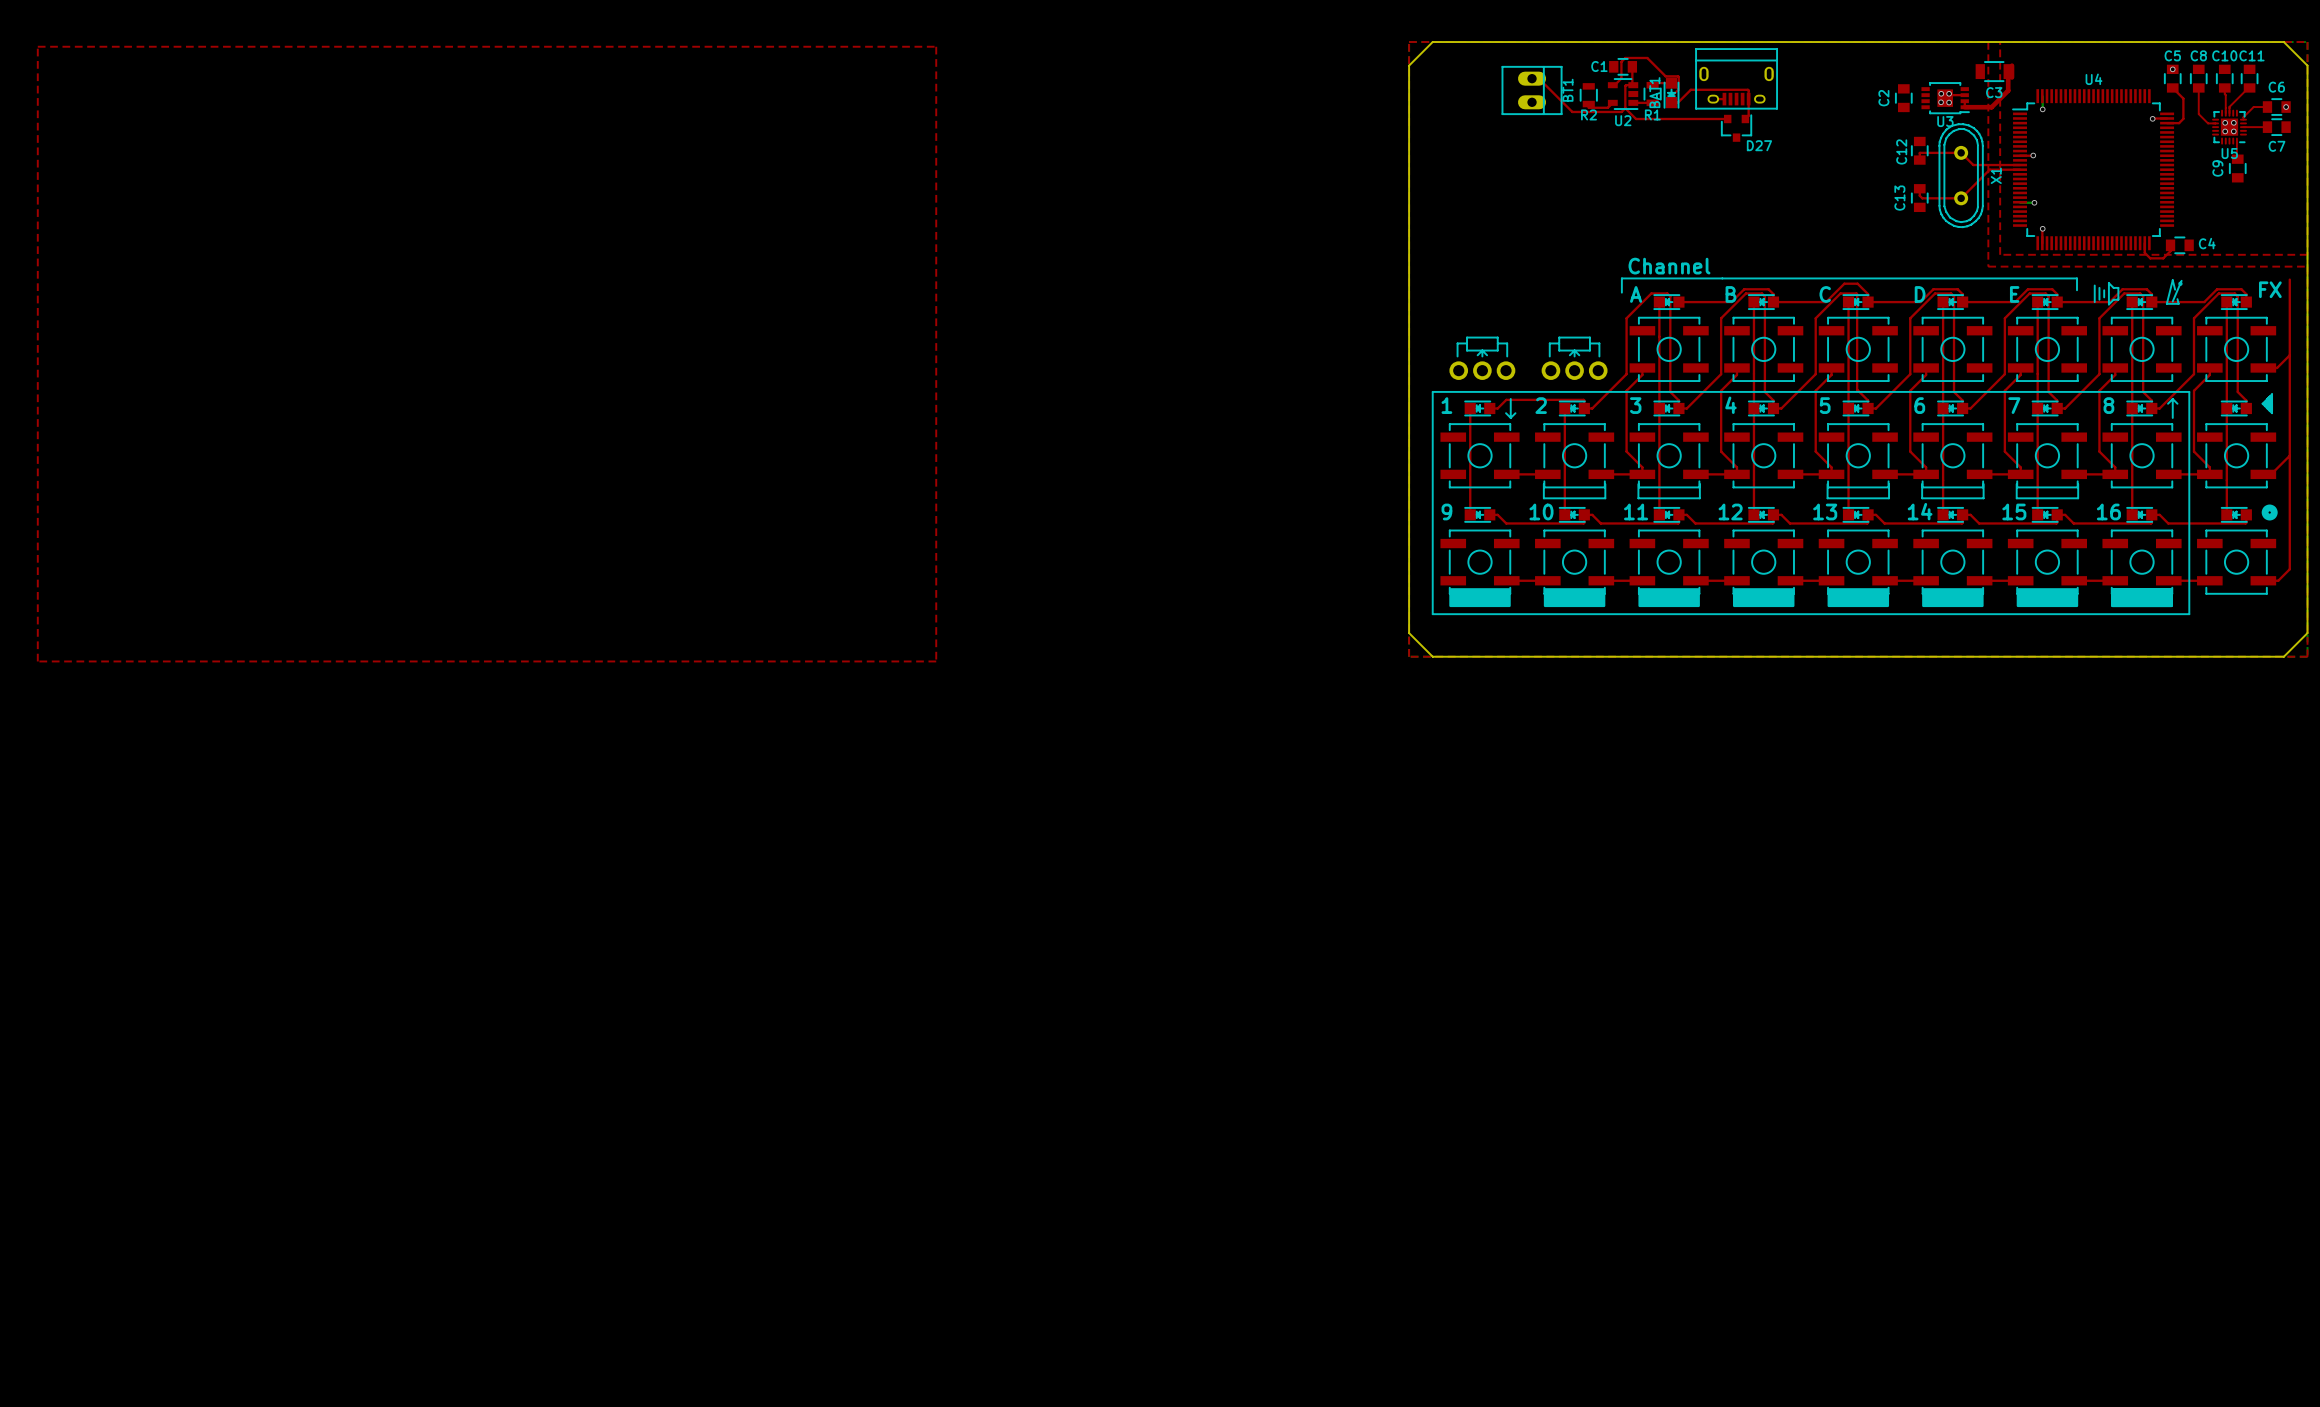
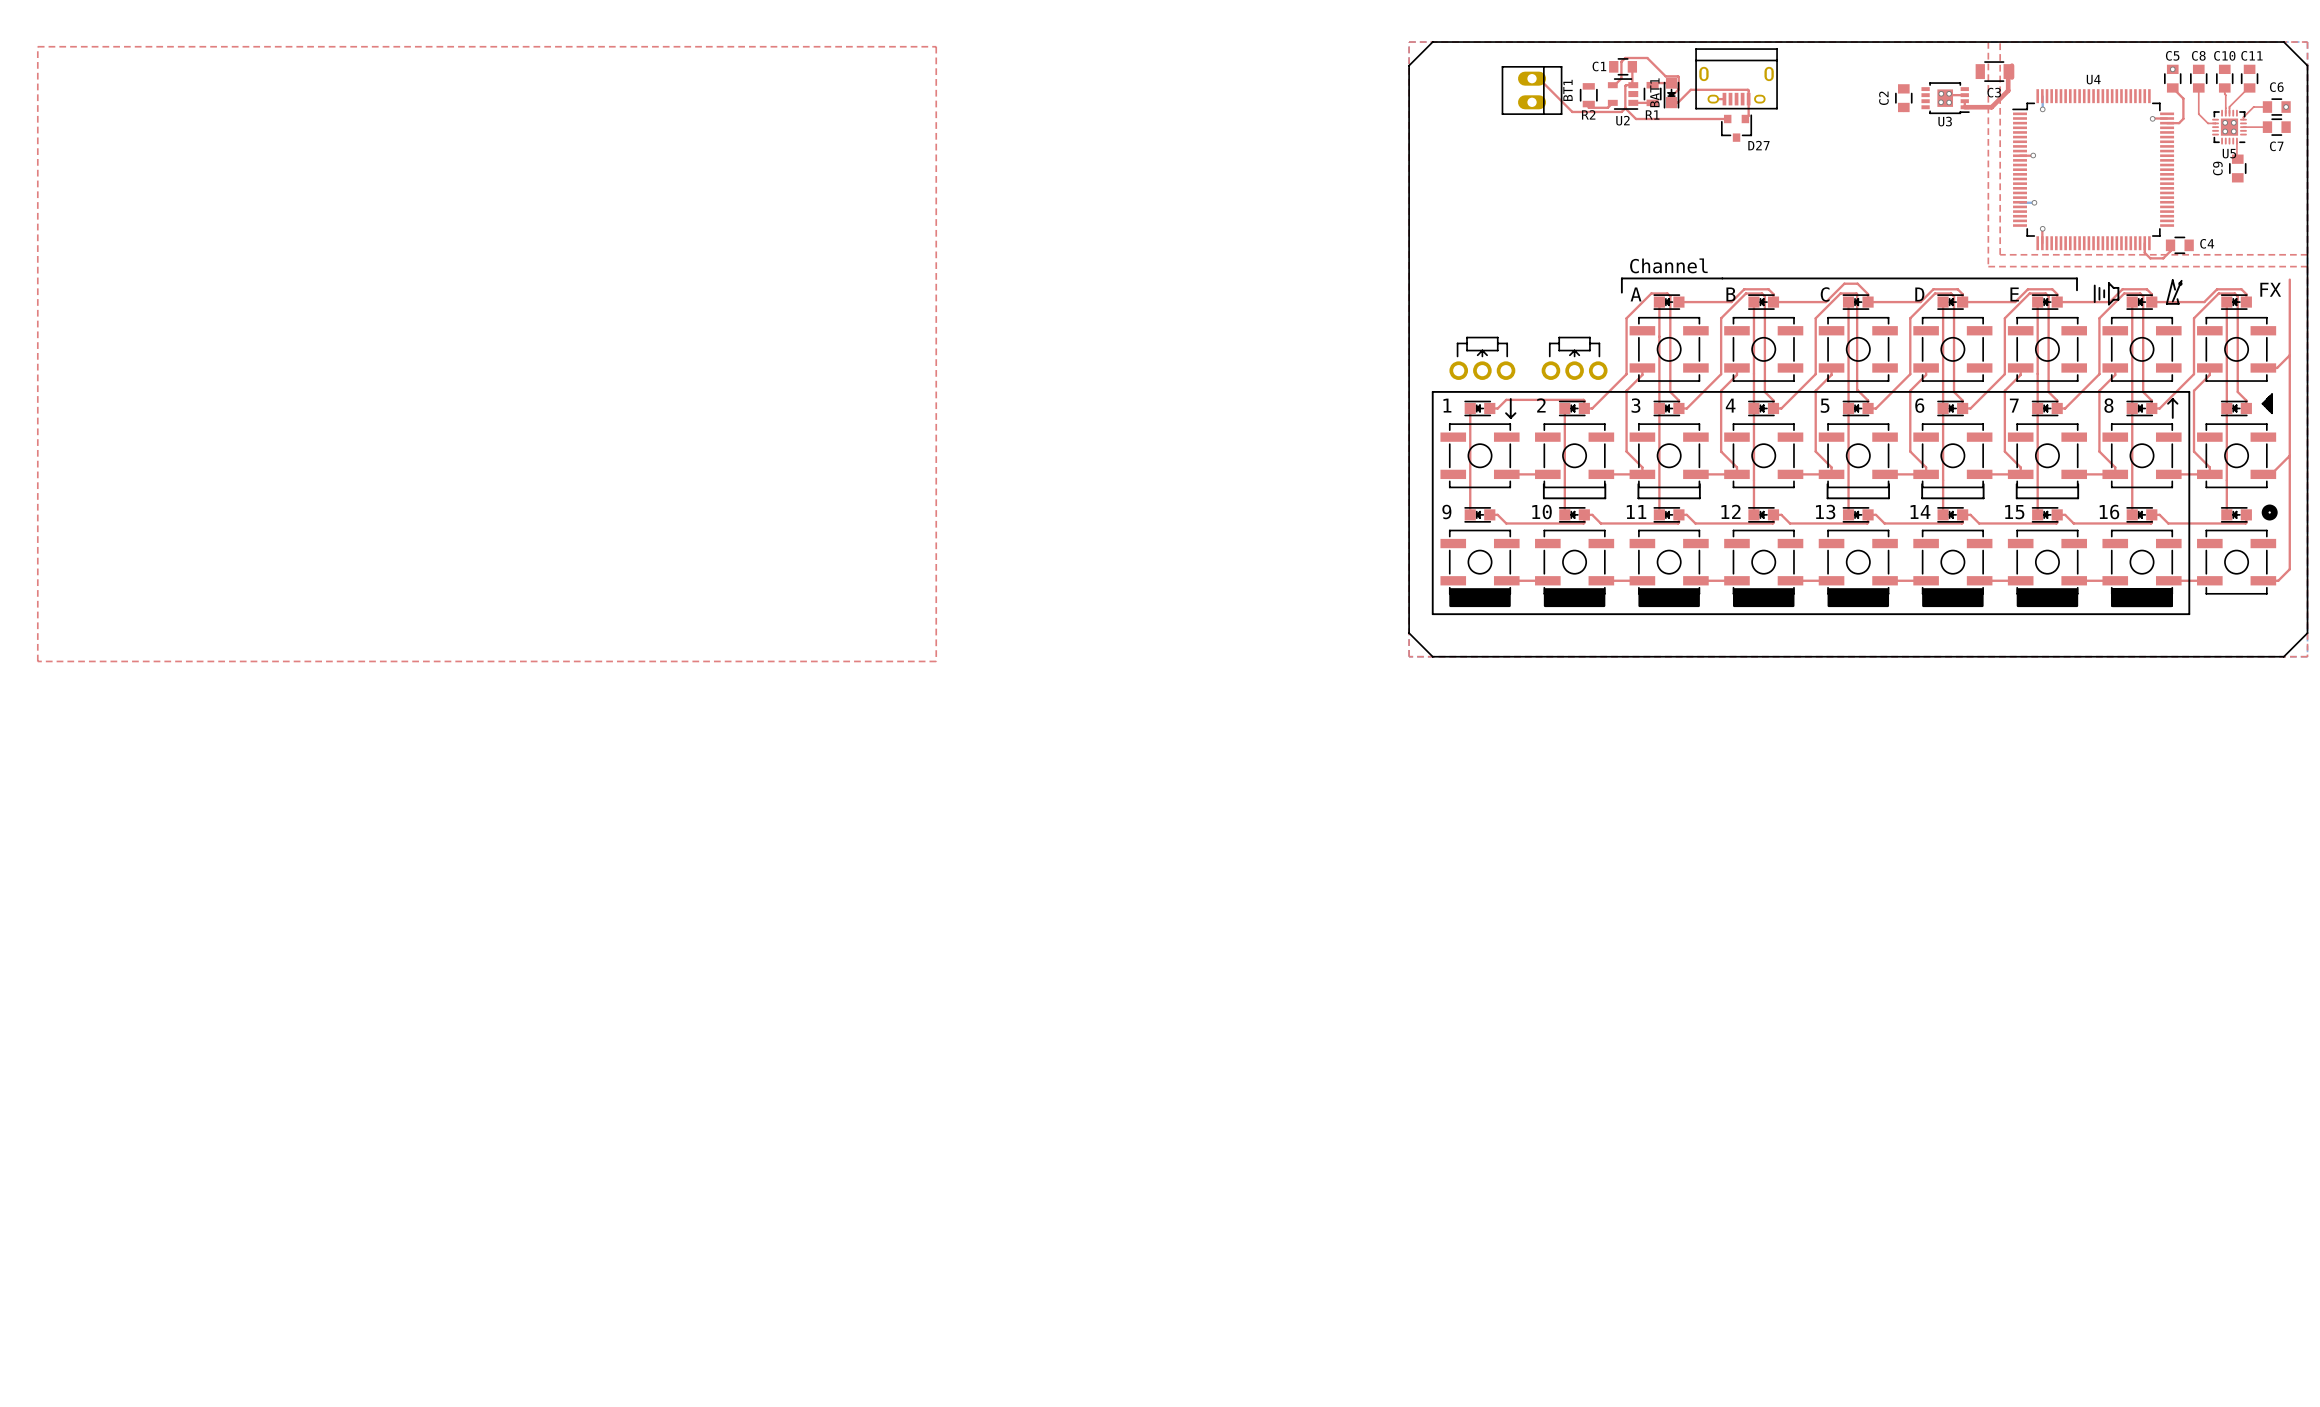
C12: (1919, 150) -> none
top track: (1919, 160) (1920, 152) (1961, 152) (1973, 165) (2020, 165) -> none
top track: (2020, 169) (1989, 169) (1961, 198) (1922, 198) (1919, 195) (1919, 188) -> none
X1: (1961, 175) -> none
C13: (1919, 198) -> none

